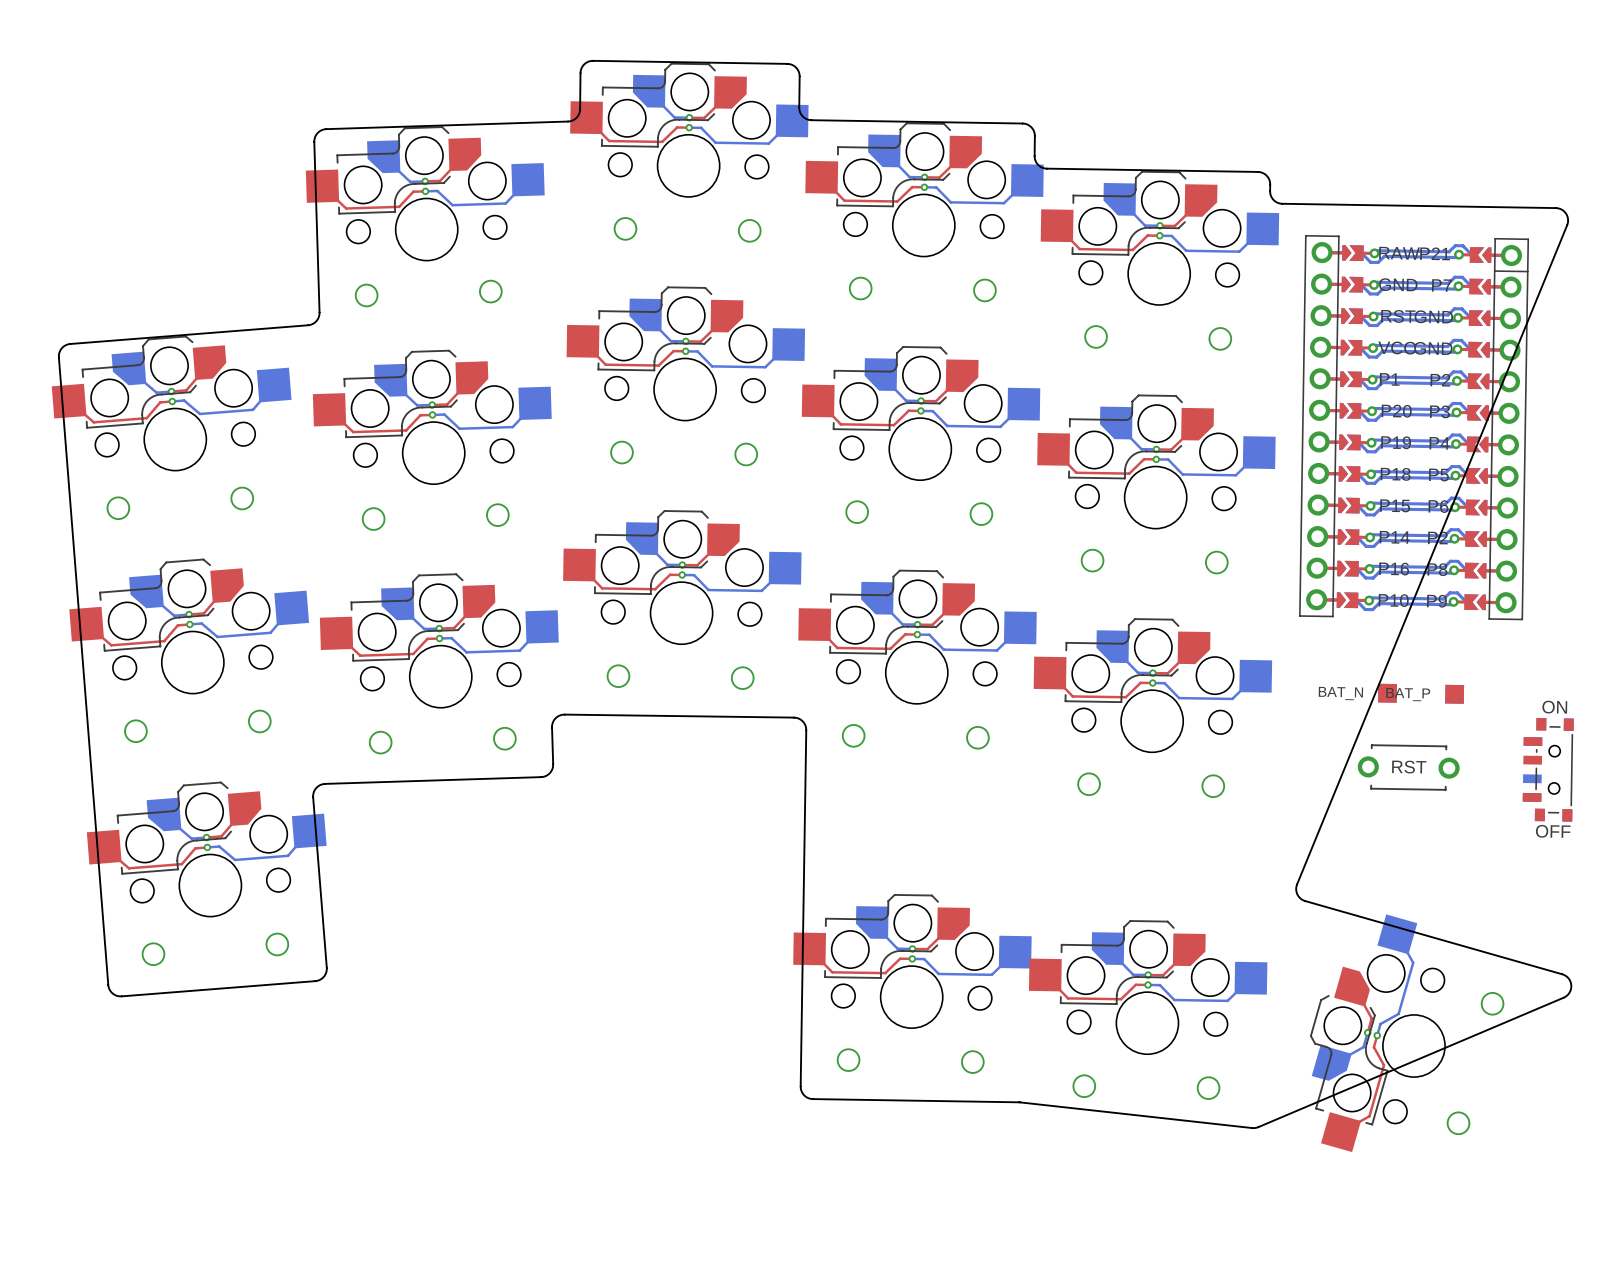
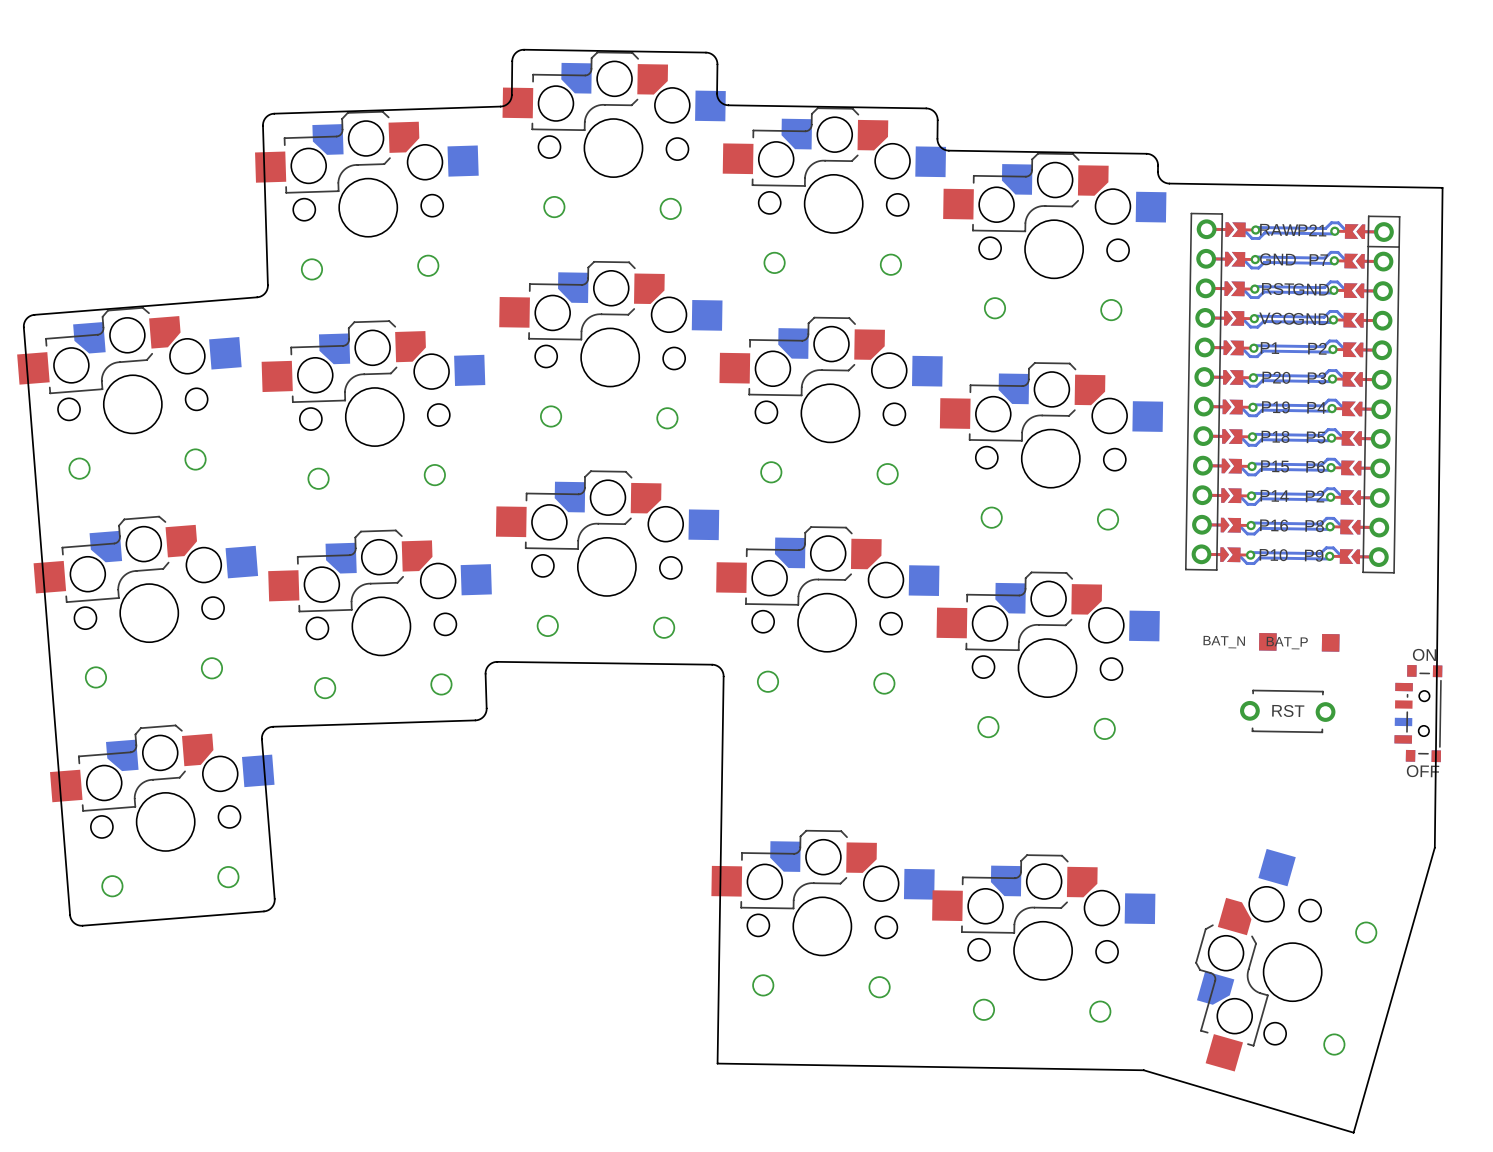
bottom track: (649, 91) (674, 117) (689, 117) -> none
top track: (730, 92) (704, 117) (689, 117) -> none
top track: (586, 117) (609, 141) (662, 141) (677, 127) (689, 127) -> none
via: (689, 117) -> none
bottom track: (792, 120) (768, 143) (715, 142) (701, 127) (689, 127) -> none
via: (689, 127) -> none
bottom track: (884, 150) (909, 177) (924, 177) -> none
top track: (965, 152) (939, 177) (924, 177) -> none
top track: (465, 154) (440, 180) (425, 181) -> none
bottom track: (383, 156) (410, 181) (425, 181) -> none
top track: (821, 177) (844, 200) (897, 201) (912, 187) (924, 187) -> none
via: (924, 177) -> none
bottom track: (528, 179) (505, 203) (452, 205) (437, 190) (425, 191) -> none
bottom track: (1027, 180) (1003, 203) (950, 202) (936, 187) (924, 187) -> none
via: (425, 181) -> none
top track: (322, 186) (346, 208) (399, 206) (413, 191) (425, 191) -> none
via: (924, 187) -> none
via: (425, 191) -> none
bottom track: (1119, 199) (1145, 225) (1159, 225) -> none
top track: (1201, 200) (1174, 226) (1159, 225) -> none
board edge: (1555, 208) (1566, 213) (1567, 225) (1296, 888) (1298, 895) (1305, 901) (1563, 974) (1570, 982) (1568, 994) (1255, 1127) (1019, 1102) (811, 1098) (804, 1095) (800, 1086) -> (1425, 187) (1442, 187) (1434, 847) (1353, 1132) (1143, 1070) (717, 1063) (718, 1010)
top track: (1057, 225) (1079, 249) (1132, 249) (1147, 235) (1159, 235) -> none
via: (1159, 225) -> none
bottom track: (1262, 228) (1239, 251) (1186, 250) (1171, 235) (1159, 235) -> none
via: (1159, 235) -> none
bottom track: (645, 314) (670, 341) (685, 341) -> none
top track: (726, 316) (700, 341) (685, 341) -> none
top track: (583, 341) (605, 364) (658, 365) (673, 351) (685, 351) -> none
via: (685, 341) -> none
bottom track: (788, 344) (765, 367) (712, 366) (697, 351) (685, 351) -> none
via: (685, 351) -> none
top track: (210, 362) (186, 390) (171, 391) -> none
bottom track: (128, 369) (156, 392) (171, 391) -> none
bottom track: (880, 374) (906, 400) (921, 401) -> none
top track: (962, 375) (935, 401) (921, 401) -> none
top track: (472, 377) (447, 404) (432, 404) -> none
bottom track: (390, 380) (417, 405) (432, 404) -> none
bottom track: (274, 385) (252, 409) (199, 413) (184, 400) (172, 401) -> none
via: (171, 391) -> none
top track: (818, 400) (840, 424) (893, 425) (908, 410) (920, 410) -> none
top track: (69, 401) (93, 422) (146, 418) (160, 402) (172, 401) -> none
via: (172, 401) -> none
via: (921, 401) -> none
bottom track: (535, 403) (512, 427) (459, 428) (444, 414) (432, 414) -> none
via: (432, 404) -> none
bottom track: (1023, 404) (1000, 426) (947, 426) (932, 411) (920, 410) -> none
top track: (329, 409) (353, 432) (406, 430) (420, 415) (432, 414) -> none
via: (920, 410) -> none
via: (432, 414) -> none
bottom track: (1116, 423) (1141, 449) (1156, 449) -> none
top track: (1197, 424) (1171, 449) (1156, 449) -> none
top track: (1053, 449) (1076, 472) (1129, 473) (1144, 459) (1156, 459) -> none
via: (1156, 449) -> none
bottom track: (1259, 452) (1235, 475) (1182, 474) (1168, 459) (1156, 459) -> none
via: (1156, 459) -> none
bottom track: (642, 538) (667, 564) (682, 565) -> none
top track: (723, 539) (697, 565) (682, 565) -> none
top track: (579, 564) (602, 588) (655, 589) (670, 574) (682, 574) -> none
via: (682, 565) -> none
bottom track: (785, 568) (761, 590) (708, 590) (694, 575) (682, 574) -> none
via: (682, 574) -> none
top track: (227, 585) (203, 613) (189, 614) -> none
bottom track: (146, 592) (174, 615) (189, 614) -> none
bottom track: (877, 598) (902, 624) (917, 624) -> none
top track: (958, 599) (932, 624) (917, 624) -> none
top track: (479, 601) (454, 628) (439, 628) -> none
bottom track: (397, 604) (424, 629) (439, 628) -> none
bottom track: (291, 608) (270, 632) (217, 636) (201, 623) (189, 624) -> none
via: (189, 614) -> none
top track: (86, 624) (111, 645) (164, 641) (177, 625) (189, 624) -> none
via: (189, 624) -> none
top track: (814, 624) (837, 647) (890, 648) (905, 634) (917, 634) -> none
via: (917, 624) -> none
bottom track: (542, 626) (519, 650) (466, 652) (451, 638) (439, 638) -> none
bottom track: (1020, 627) (996, 650) (943, 649) (929, 634) (917, 634) -> none
via: (439, 628) -> none
top track: (336, 633) (360, 655) (413, 653) (427, 638) (439, 638) -> none
via: (917, 634) -> none
via: (439, 638) -> none
bottom track: (1112, 646) (1138, 672) (1152, 673) -> none
top track: (1194, 647) (1167, 673) (1152, 673) -> none
top track: (1050, 673) (1072, 696) (1125, 697) (1140, 682) (1152, 683) -> none
via: (1152, 673) -> none
bottom track: (1255, 676) (1232, 698) (1179, 698) (1164, 683) (1152, 683) -> none
via: (1152, 683) -> none
top track: (245, 808) (221, 836) (206, 837) -> none
bottom track: (164, 815) (191, 838) (206, 837) -> none
bottom track: (309, 831) (288, 855) (235, 859) (219, 846) (207, 847) -> none
via: (206, 837) -> none
top track: (104, 847) (129, 868) (181, 864) (195, 848) (207, 847) -> none
via: (207, 847) -> none
bottom track: (872, 922) (897, 948) (912, 948) -> none
top track: (953, 923) (927, 949) (912, 948) -> none
bottom track: (1397, 934) (1413, 962) (1398, 1013) (1380, 1024) (1377, 1035) -> none
top track: (809, 948) (832, 972) (885, 973) (900, 958) (912, 958) -> none
via: (912, 948) -> none
bottom track: (1107, 948) (1133, 974) (1148, 975) -> none
top track: (1189, 949) (1163, 975) (1148, 975) -> none
bottom track: (1015, 952) (991, 974) (938, 973) (924, 959) (912, 958) -> none
via: (912, 958) -> none
top track: (1045, 974) (1068, 998) (1121, 999) (1135, 984) (1148, 984) -> none
via: (1148, 975) -> none
bottom track: (1250, 978) (1227, 1000) (1174, 1000) (1159, 985) (1148, 984) -> none
via: (1148, 984) -> none
top track: (1354, 986) (1371, 1018) (1367, 1032) -> none
bottom track: (1367, 1032) (1363, 1047) (1331, 1064) -> none
via: (1367, 1032) -> none
top track: (1377, 1035) (1373, 1047) (1383, 1065) (1369, 1116) (1340, 1132) -> none
via: (1377, 1035) -> none

